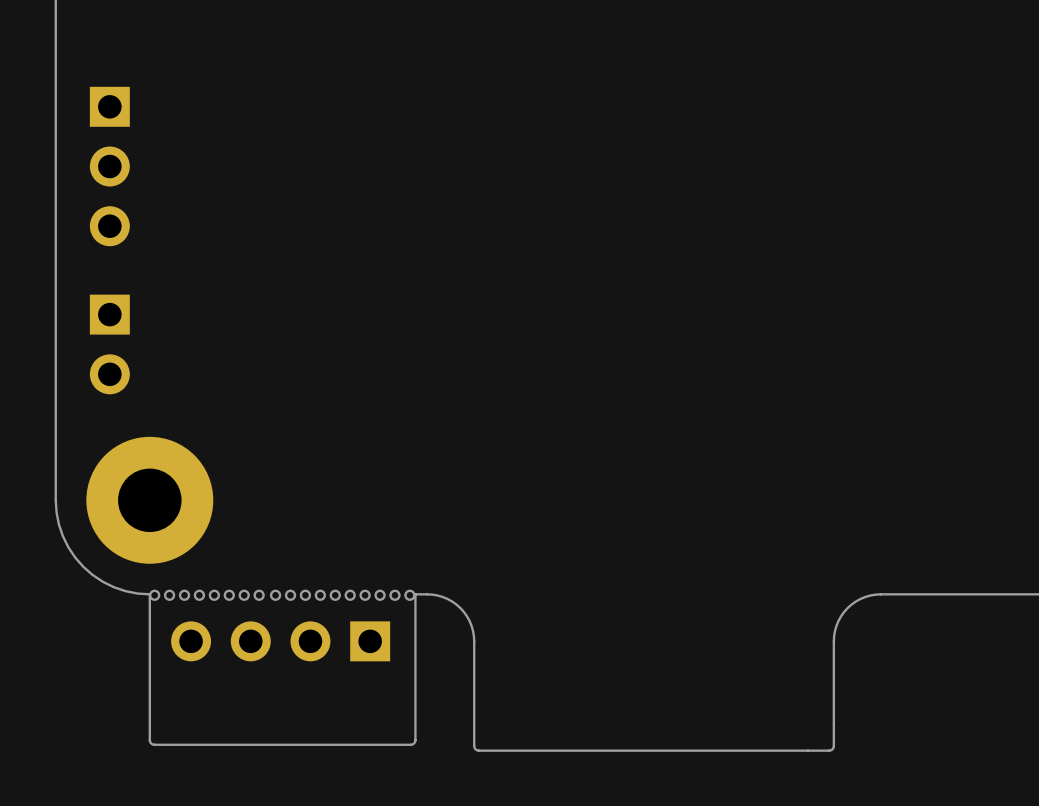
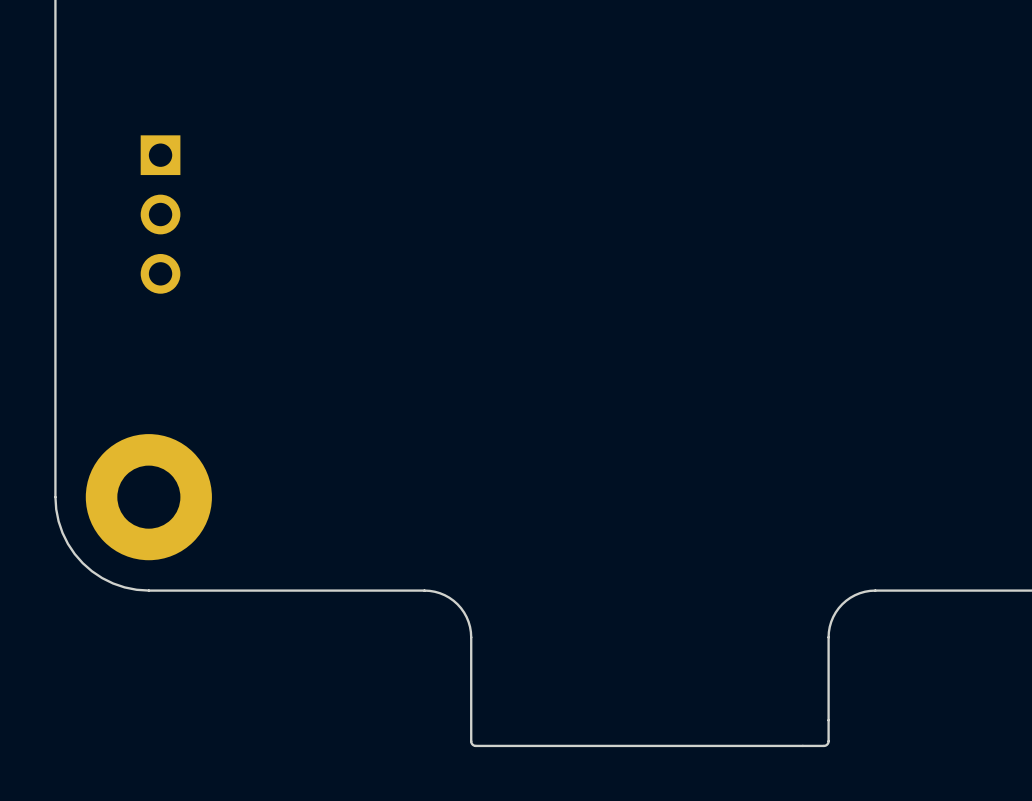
part position: (109, 166) -> (160, 214)
part: (109, 344) -> none
round board edge: [149, 589, 161, 601] -> none
round board edge: [163, 589, 176, 601] -> none
round board edge: [178, 589, 191, 601] -> none
round board edge: [193, 589, 206, 601] -> none
round board edge: [208, 589, 221, 601] -> none
round board edge: [223, 589, 235, 601] -> none
round board edge: [238, 589, 250, 601] -> none
round board edge: [253, 589, 265, 601] -> none
round board edge: [269, 589, 282, 601] -> none
round board edge: [284, 589, 297, 601] -> none
round board edge: [299, 589, 312, 601] -> none
round board edge: [314, 589, 326, 601] -> none
round board edge: [329, 589, 341, 601] -> none
round board edge: [344, 589, 356, 601] -> none
round board edge: [359, 589, 371, 601] -> none
round board edge: [374, 589, 386, 601] -> none
round board edge: [389, 589, 401, 601] -> none
round board edge: [404, 589, 416, 601] -> none
board edge: (415, 594) (415, 740) (410, 744) (152, 744) (149, 740) (149, 594) -> (412, 590) (148, 590)
part: (280, 641) -> none

